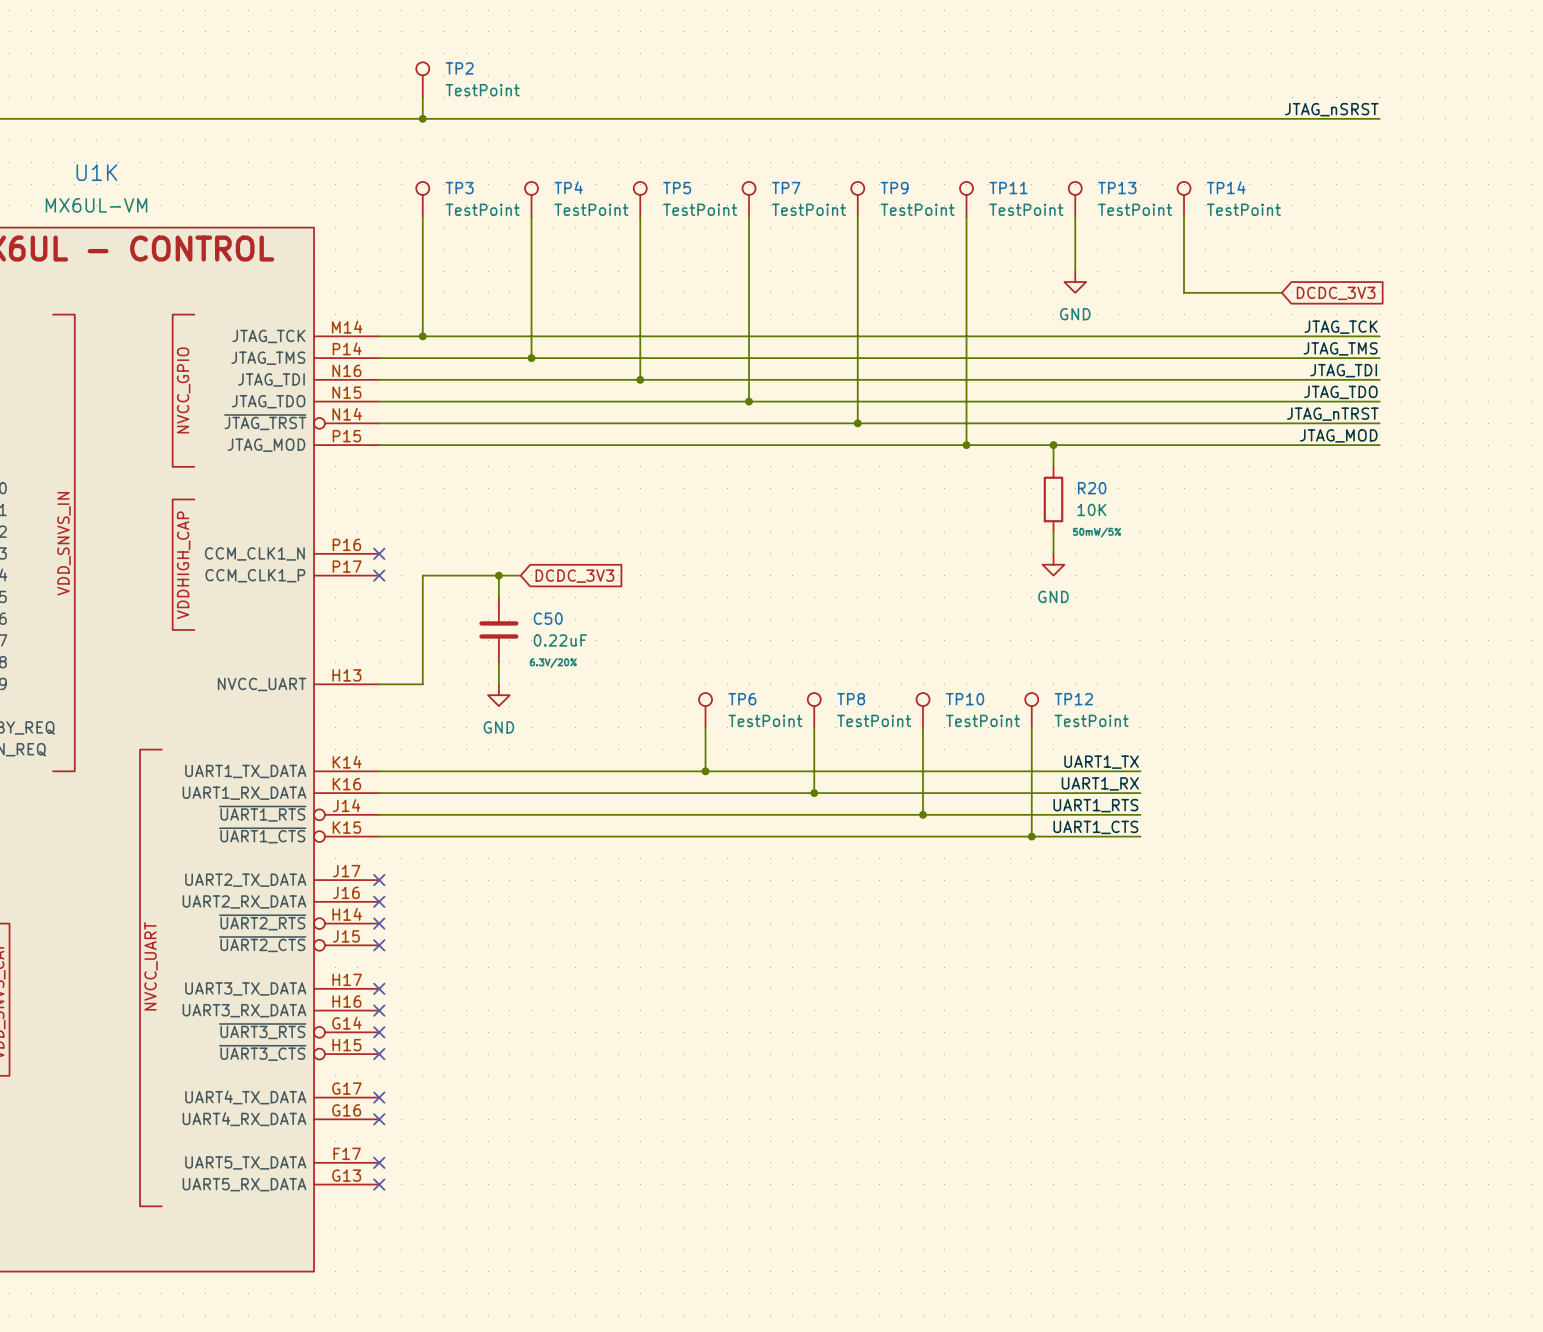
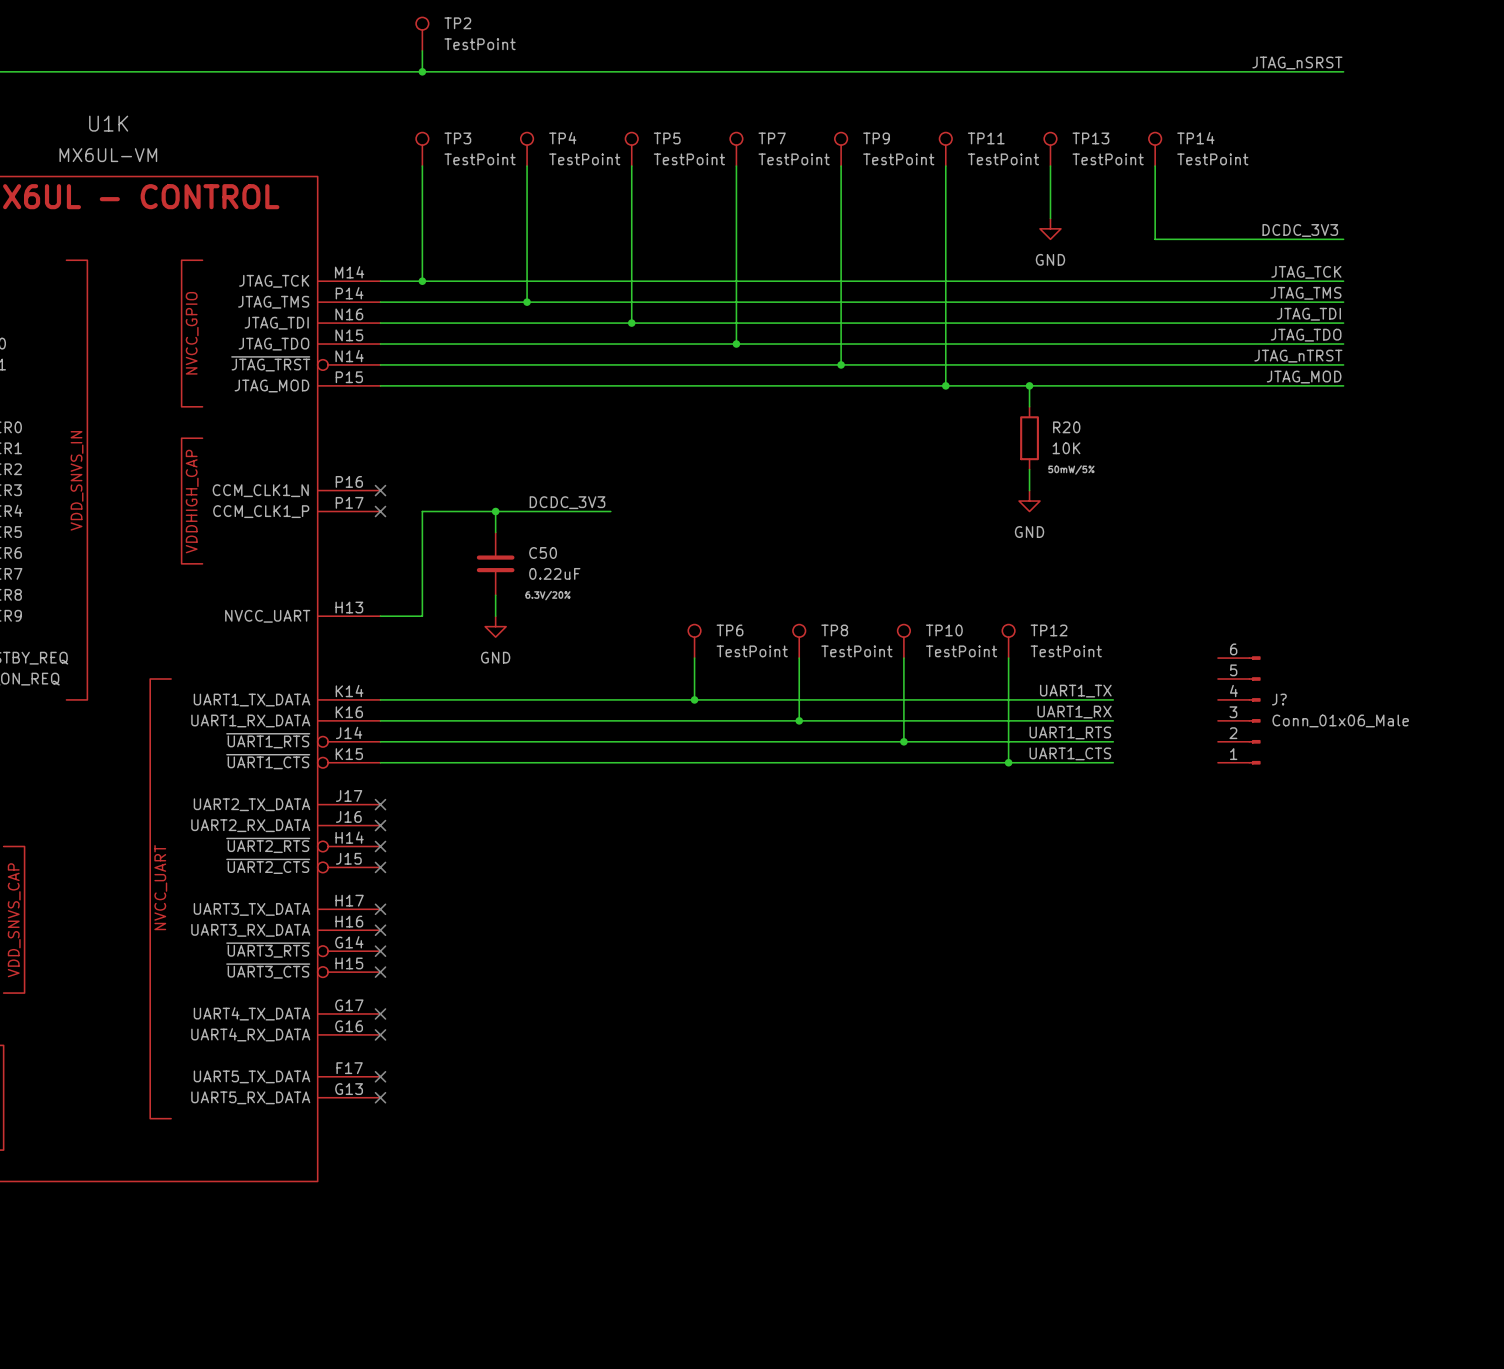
label: none -> DCDC_3V3 (1300, 230)
wire: none -> (1249, 239) (1343, 239)
global label: DCDC_3V3 (1336, 293) -> none
label: none -> DCDC_3V3 (567, 502)
wire: none -> (516, 511) (610, 511)
global label: DCDC_3V3 (574, 576) -> none
J?: none -> Conn_01x06_Male (1239, 710)

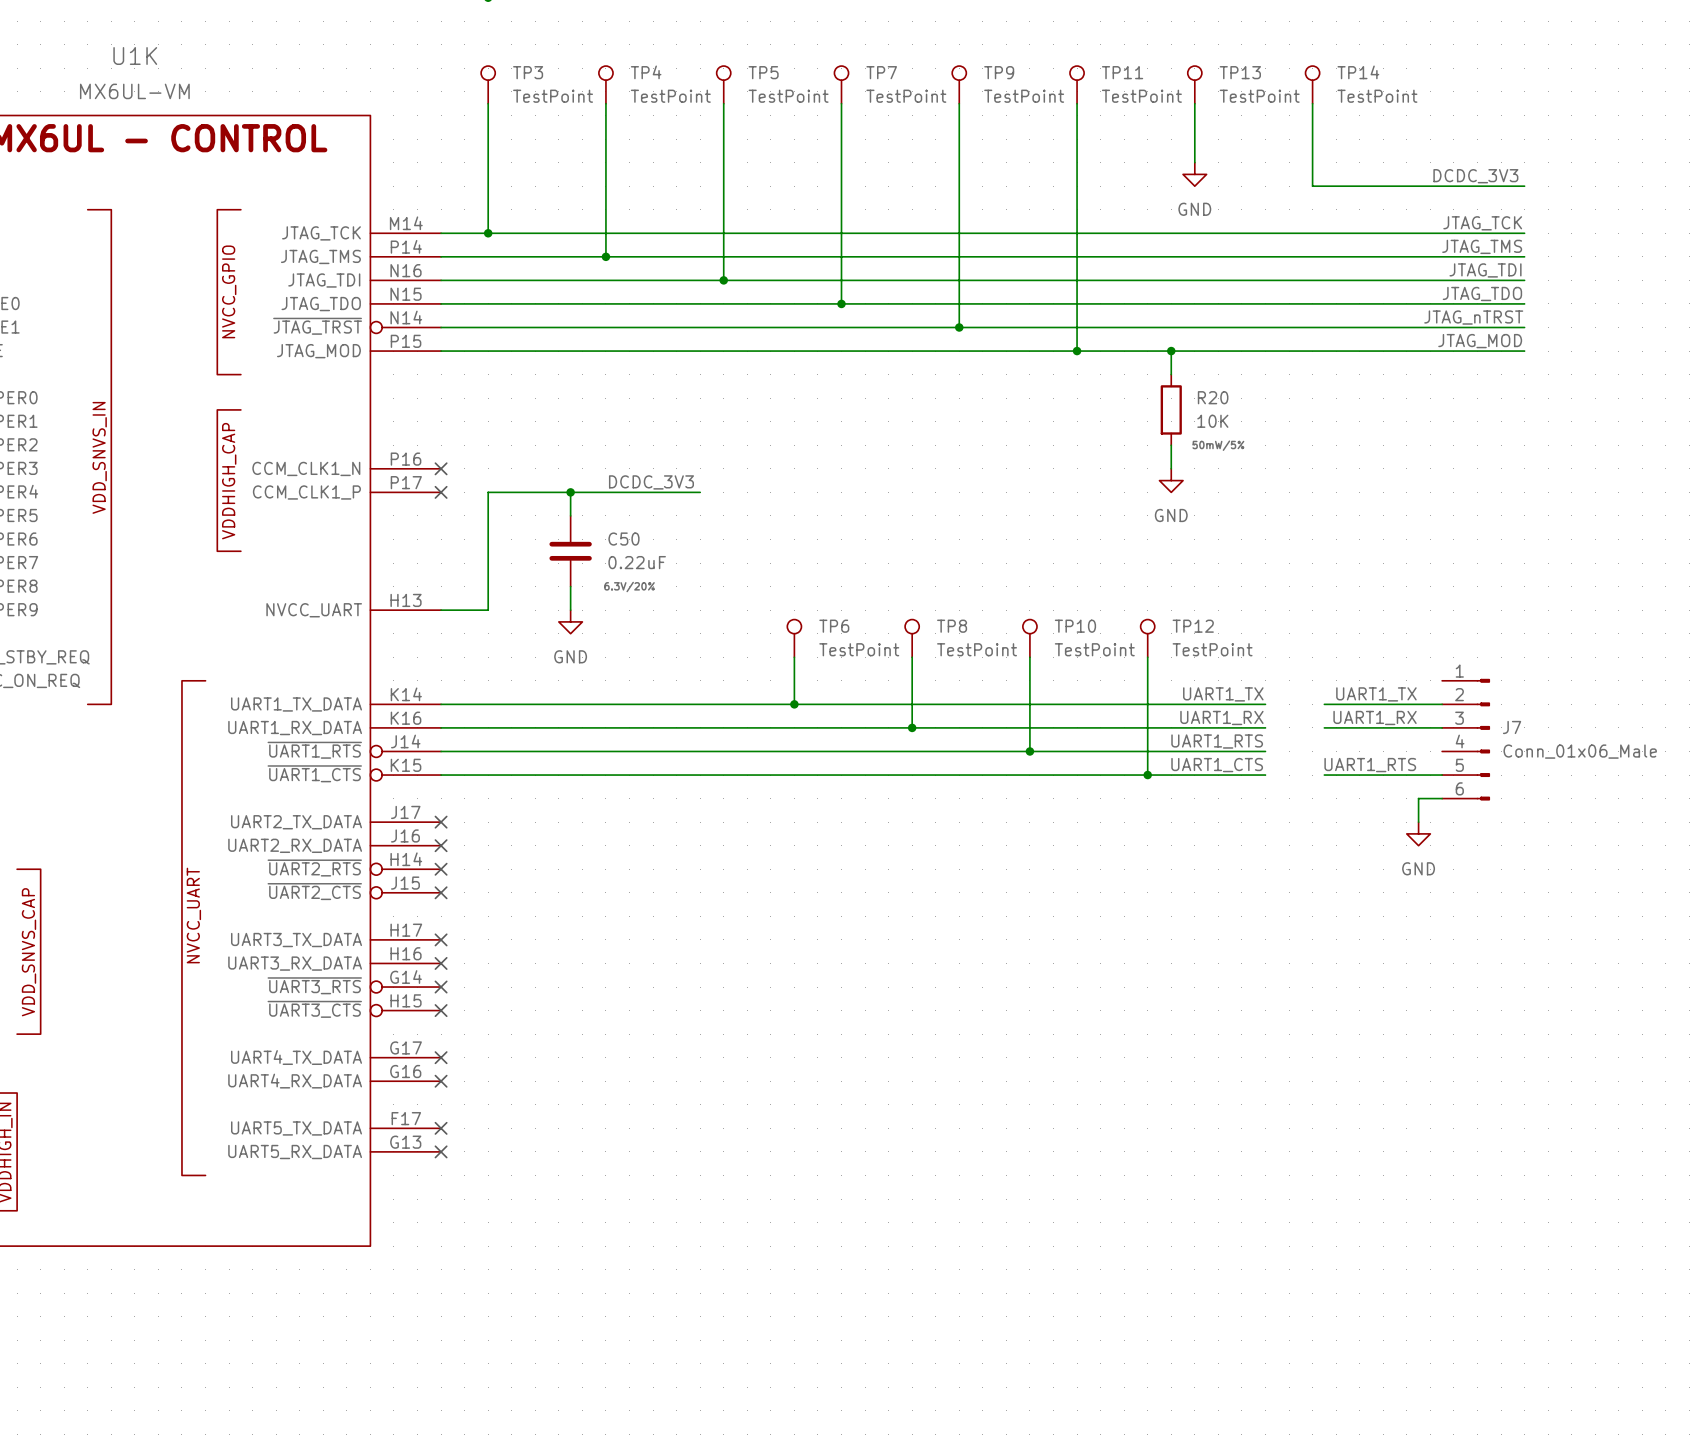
label: none -> UART1_TX (1376, 694)
wire: none -> (1324, 704) (1442, 704)
J?: Conn_01x06_Male (1239, 710) -> none
label: none -> UART1_RX (1375, 717)
wire: none -> (1324, 727) (1442, 727)
J7: none -> Conn_01x06_Male (1466, 739)
label: none -> UART1_RTS (1370, 765)
wire: none -> (1324, 775) (1442, 775)
wire: none -> (1442, 798) (1418, 798) (1418, 822)
power symbol: none -> GND (1418, 833)

